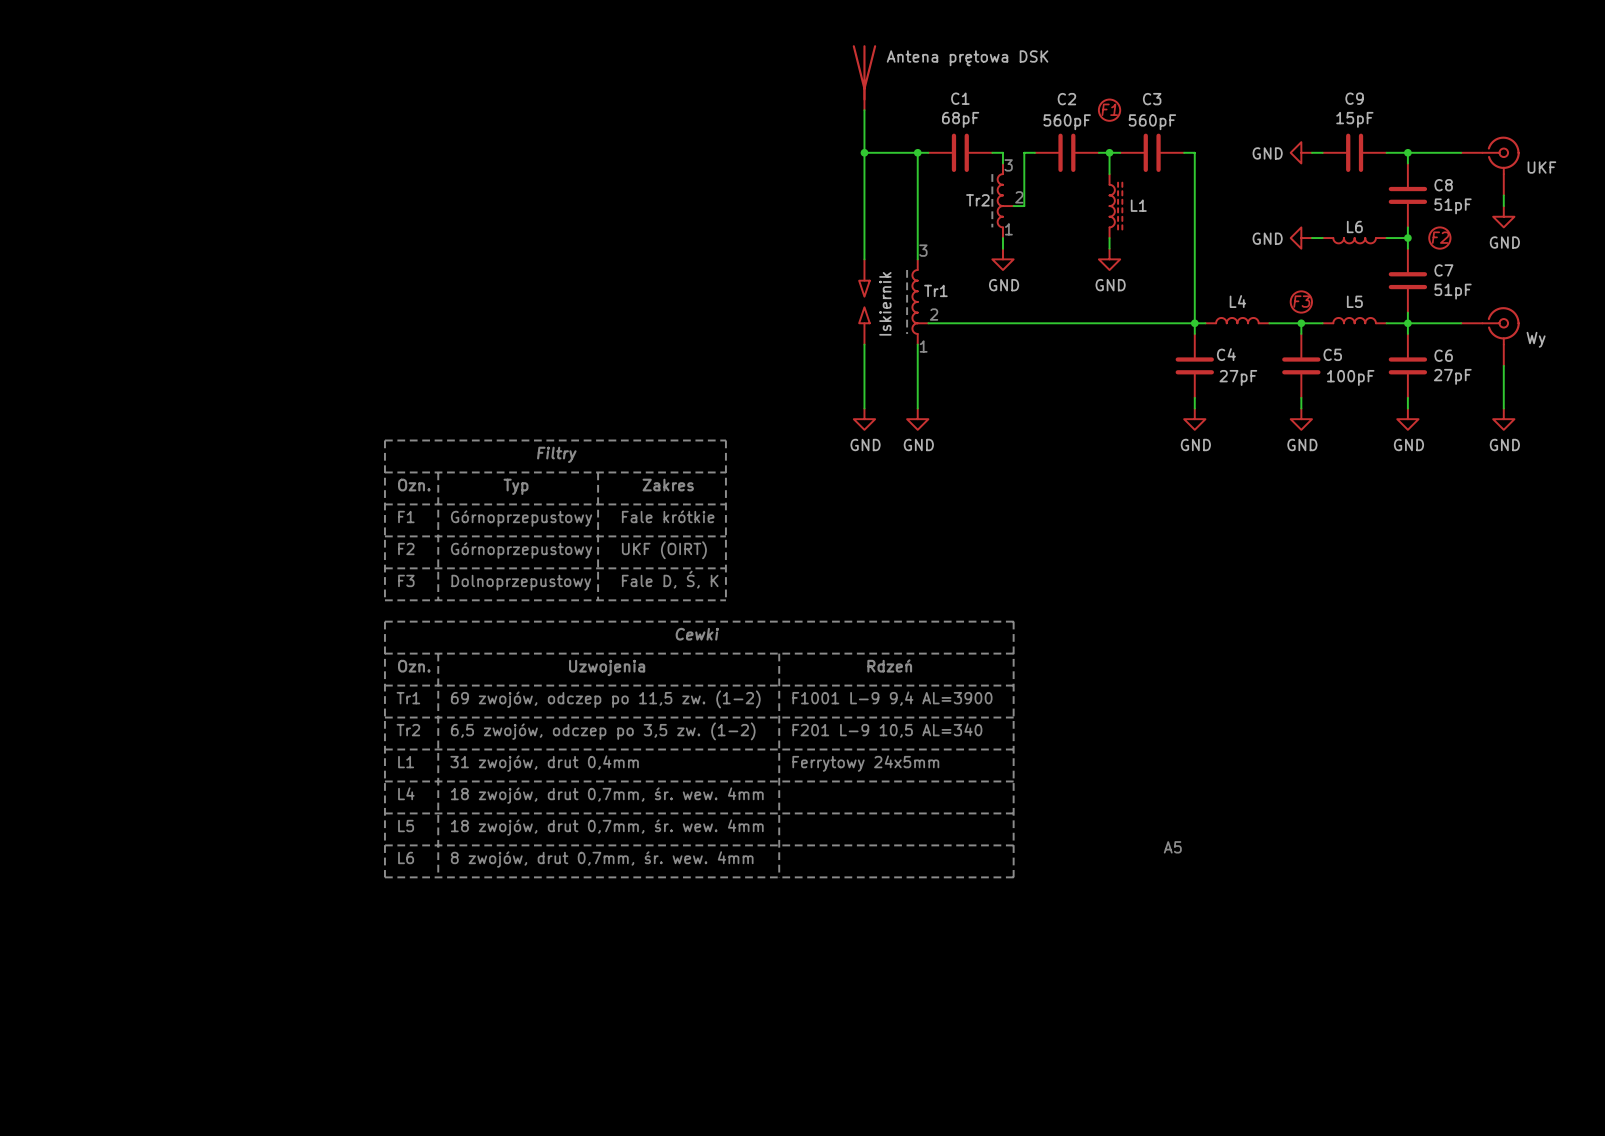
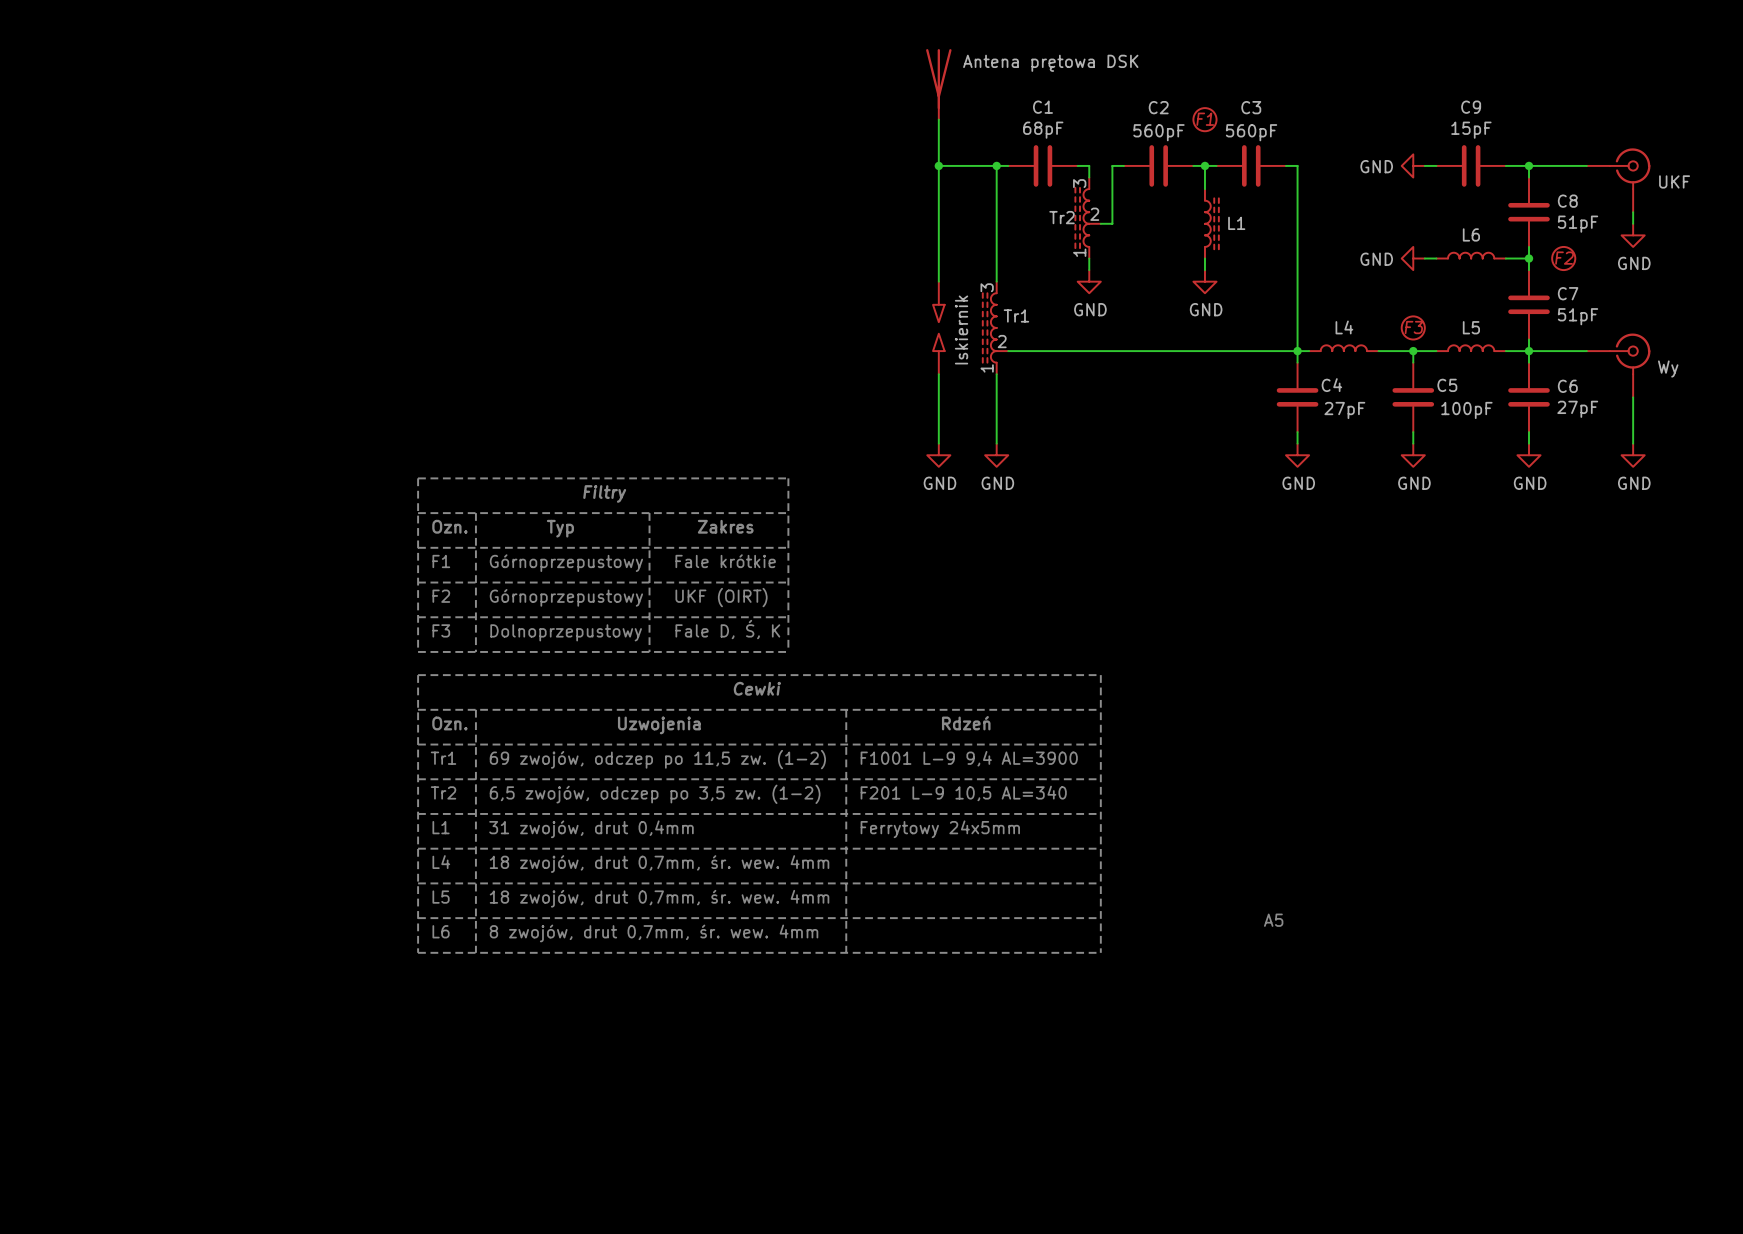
Tr2 symbol: [997, 163, 1014, 239] -> [1075, 177, 1101, 259]
text: 3 (1008, 165) -> none
line: (992, 174) (992, 227) -> none
text: 2 (1019, 197) -> none
text: 1 (1008, 229) -> none
L6 rotation: 0° (1354, 240) -> 180° (1471, 255)
text: 3 (923, 250) -> none
Tr1 symbol: [912, 259, 929, 345] -> [982, 281, 1009, 375]
line: (907, 270) (907, 333) -> none
text: 2 (934, 314) -> none
text: 1 (923, 346) -> none

